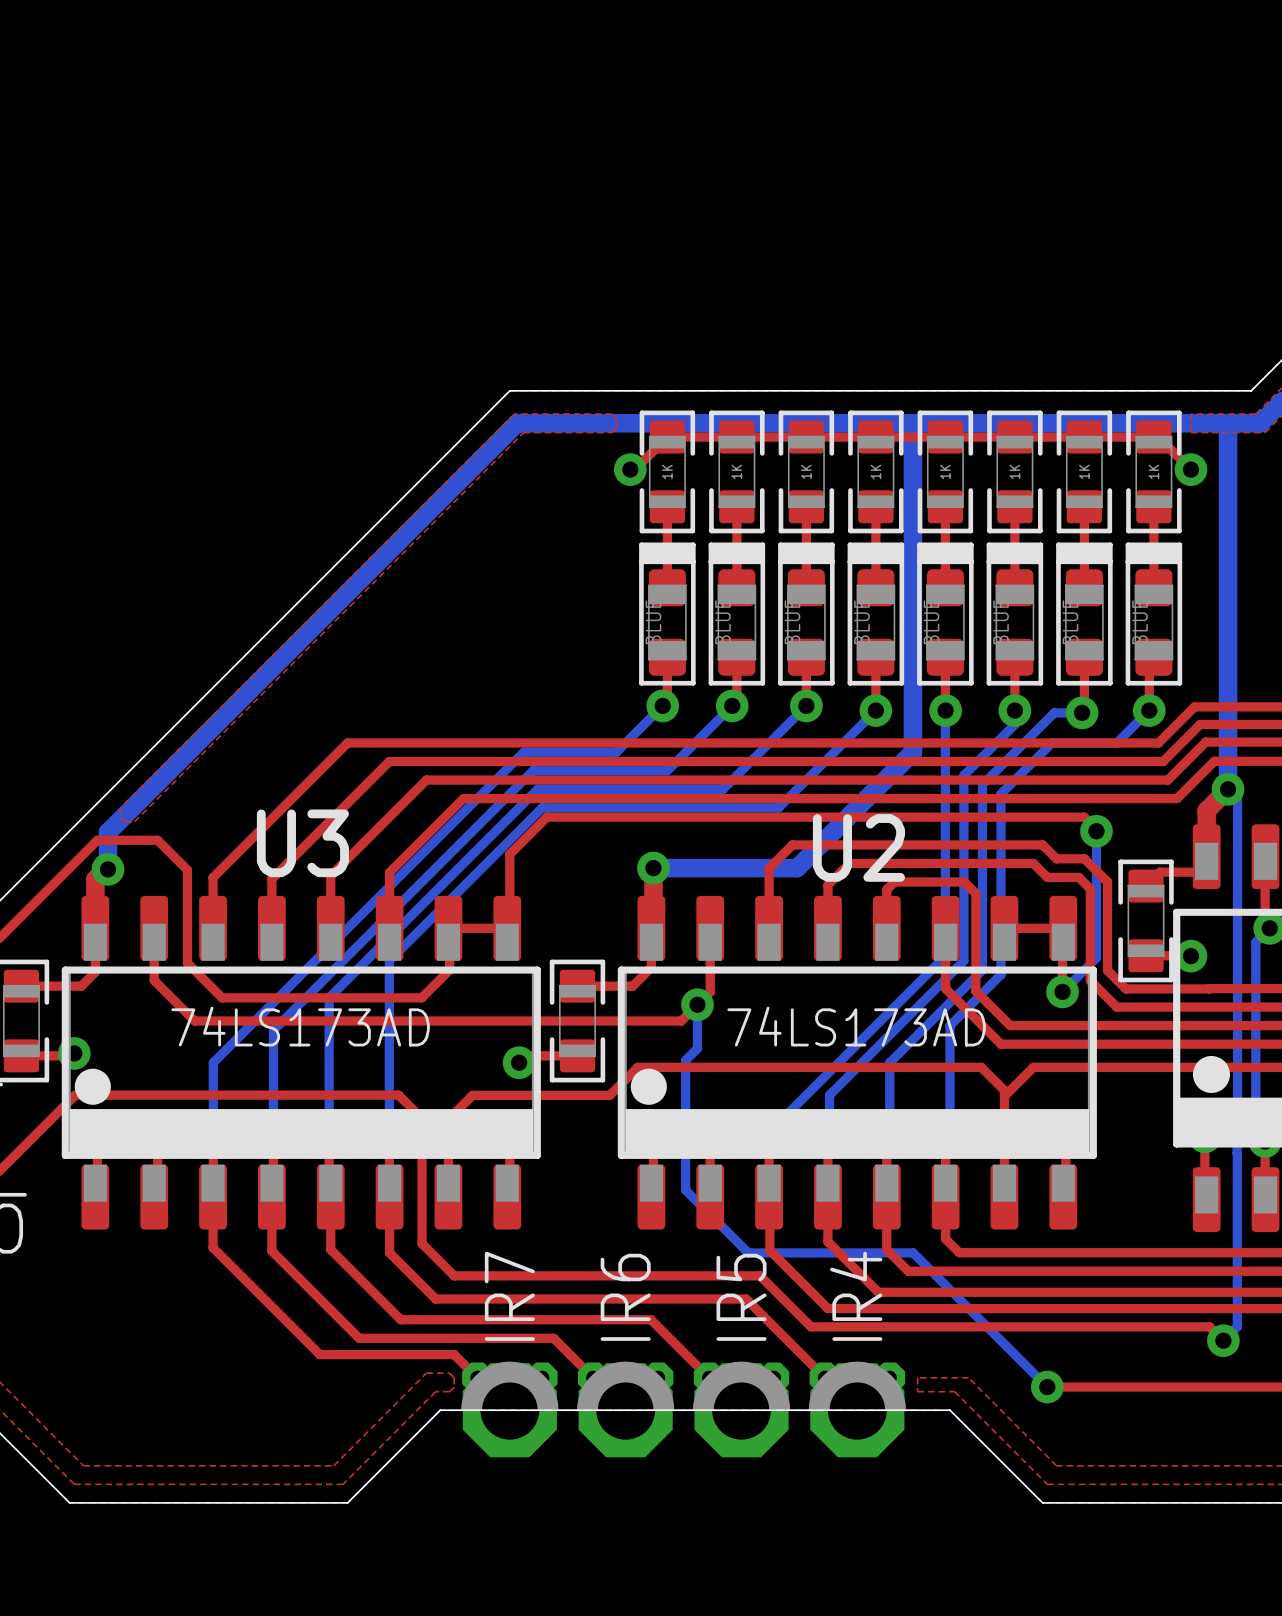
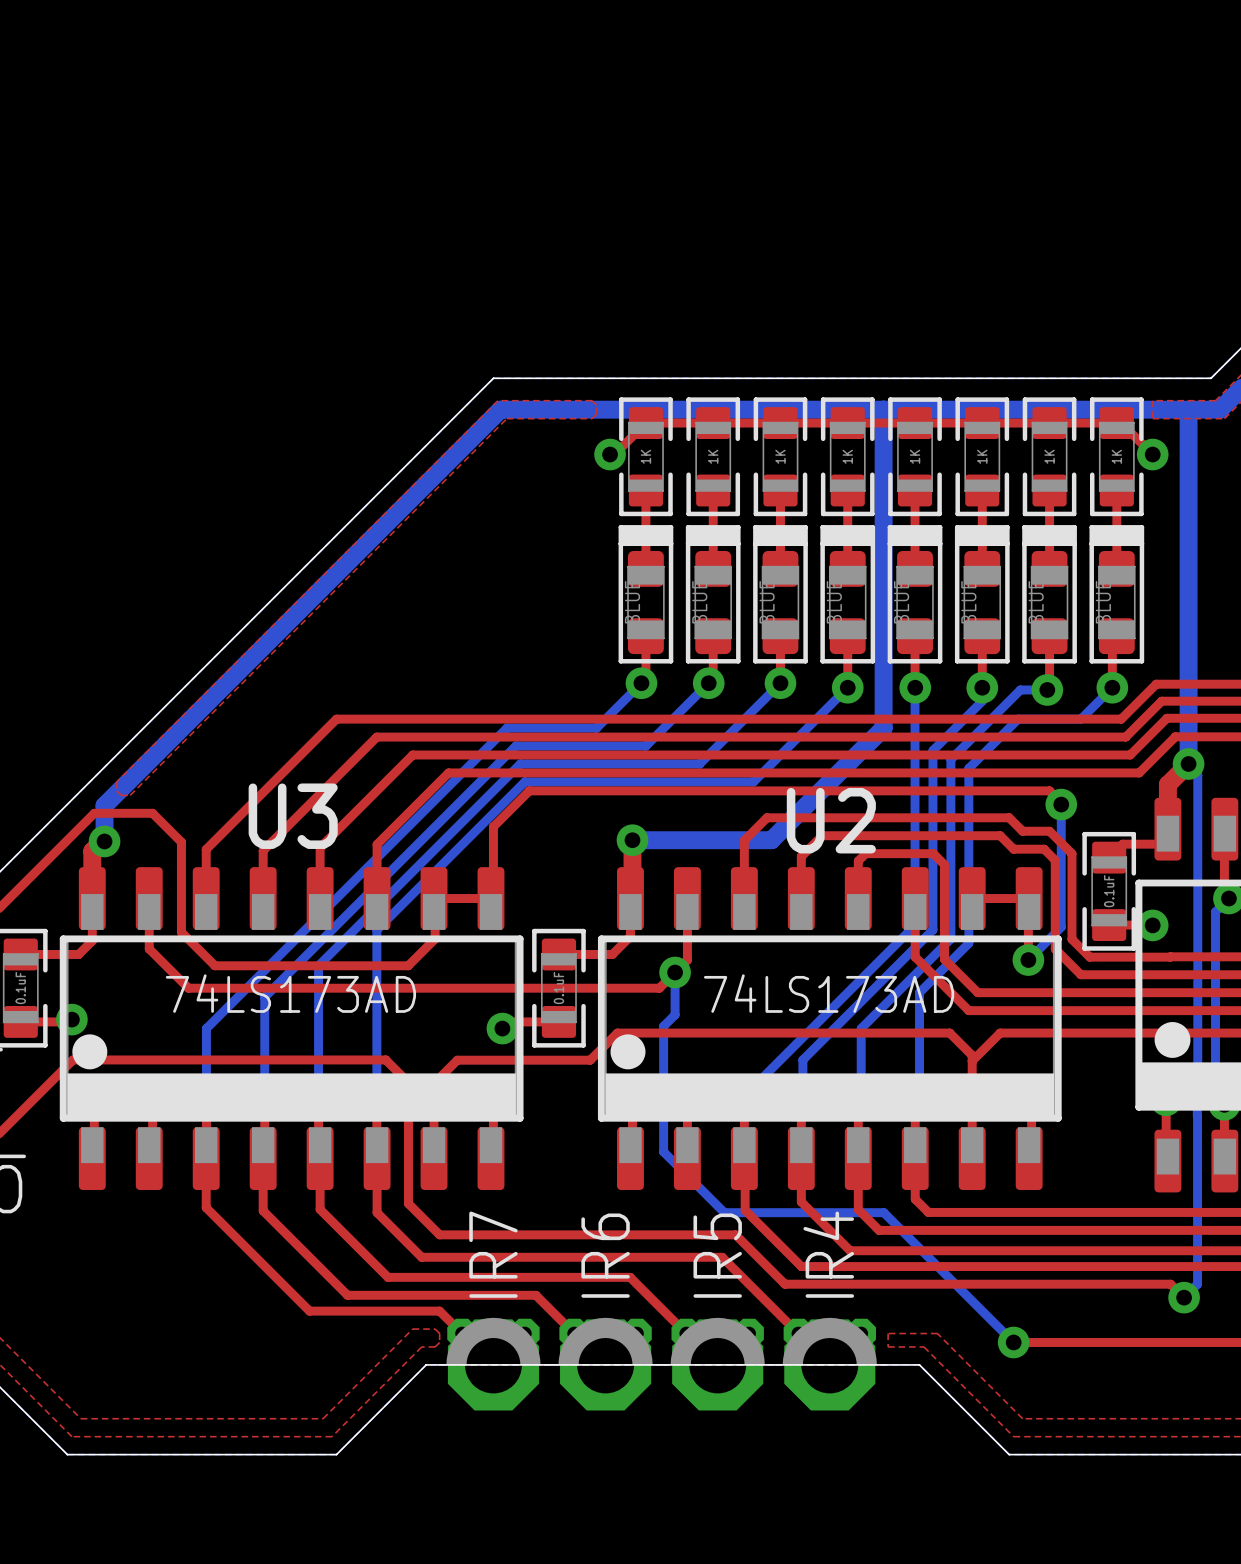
part value: none -> 0.1uF (1109, 891)
part value: none -> 0.1uF (20, 988)
part value: none -> 0.1uF (558, 988)

